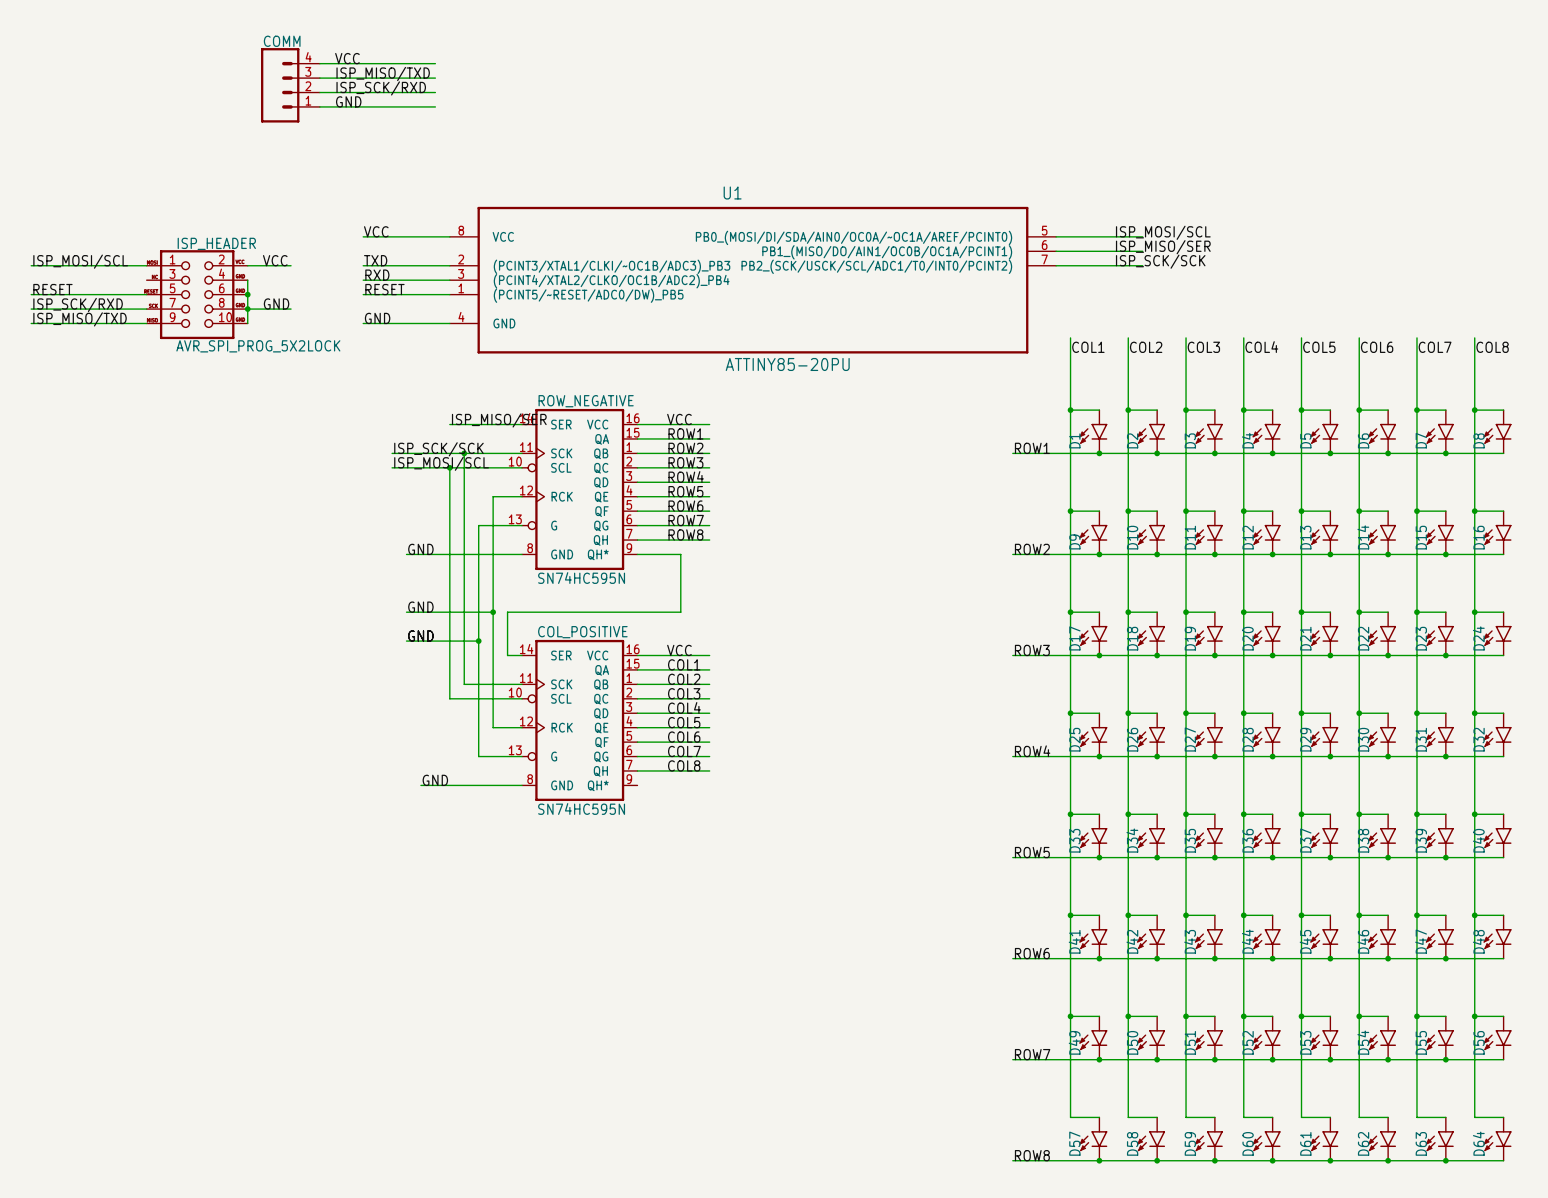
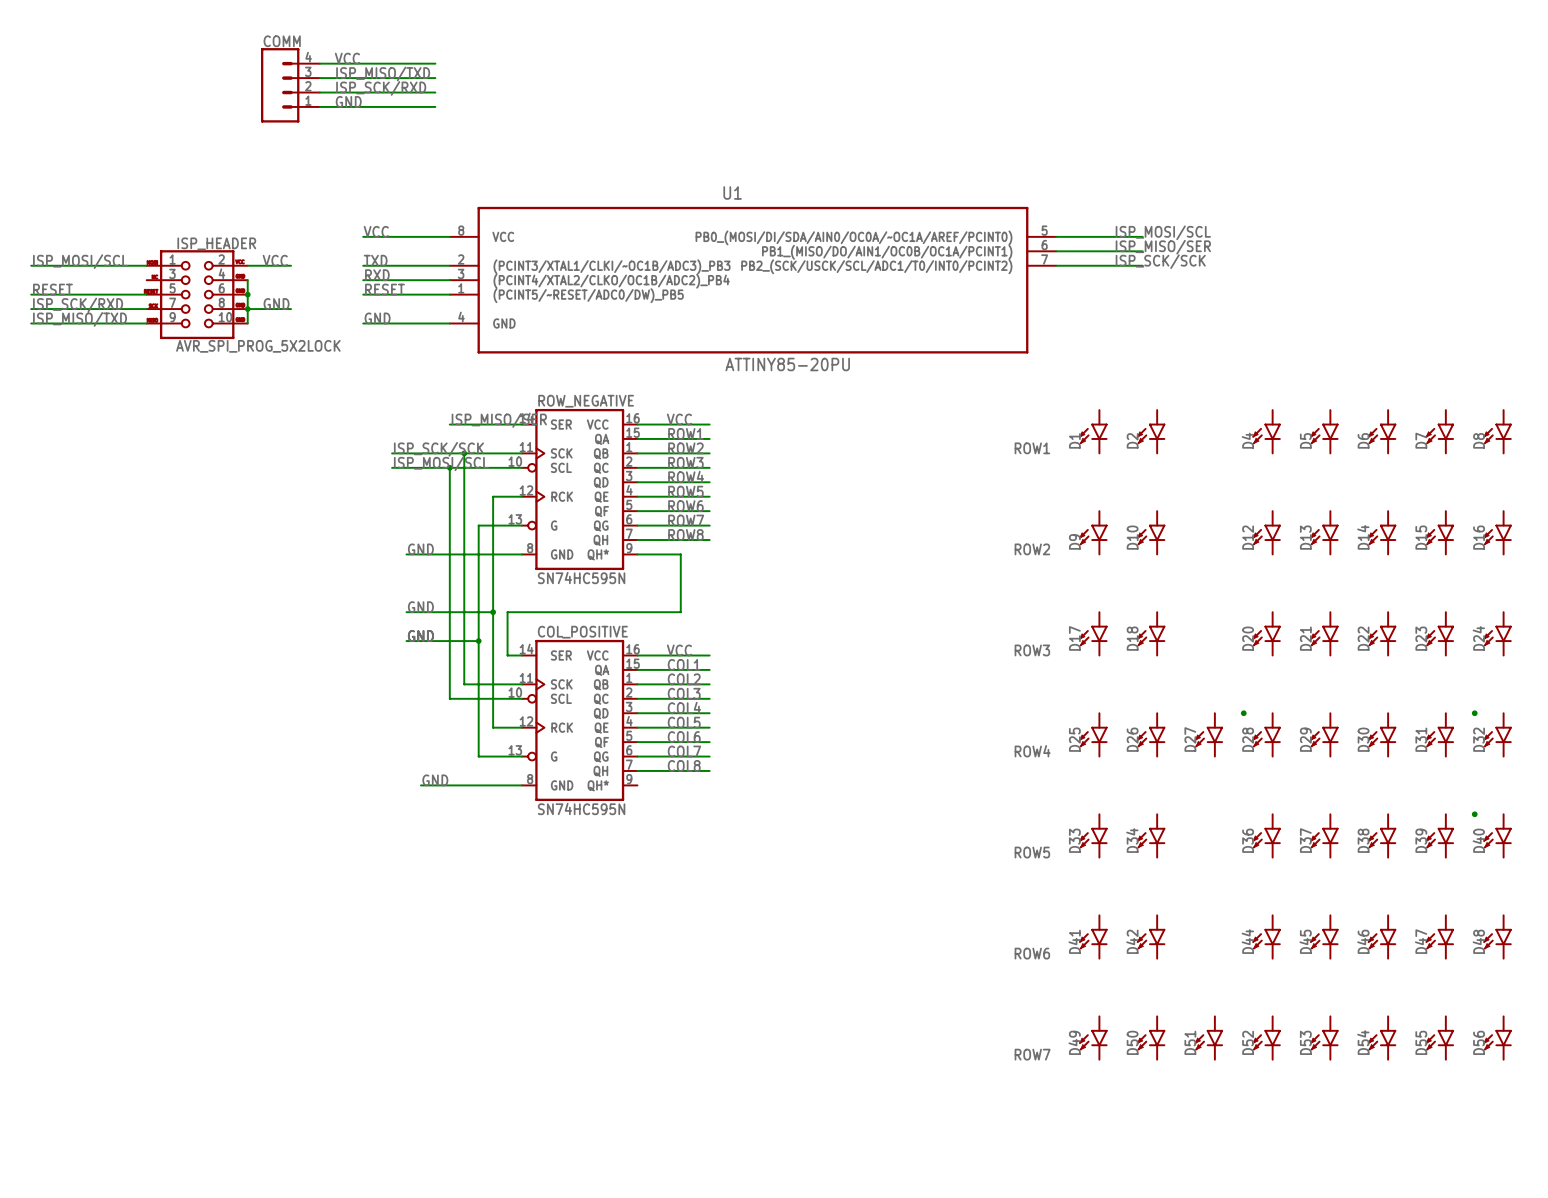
wire: (1070, 337) (1070, 1117) (1099, 1117) -> none
wire: (1128, 337) (1128, 1117) (1157, 1117) -> none
wire: (1186, 337) (1186, 1117) (1214, 1117) -> none
wire: (1243, 337) (1243, 1117) (1272, 1117) -> none
wire: (1301, 337) (1301, 1117) (1330, 1117) -> none
wire: (1359, 337) (1359, 1117) (1388, 1117) -> none
wire: (1416, 337) (1416, 1117) (1445, 1117) -> none
wire: (1474, 337) (1474, 1117) (1503, 1117) -> none
label: COL1 (1088, 347) -> none
label: COL2 (1146, 347) -> none
label: COL3 (1203, 347) -> none
label: COL4 (1261, 347) -> none
label: COL5 (1319, 347) -> none
label: COL6 (1377, 347) -> none
label: COL7 (1435, 347) -> none
label: COL8 (1492, 347) -> none
wire: (1070, 410) (1099, 410) -> none
junction: (1070, 410) -> none
wire: (1128, 410) (1157, 410) -> none
junction: (1128, 410) -> none
wire: (1186, 410) (1214, 410) -> none
junction: (1186, 410) -> none
wire: (1243, 410) (1272, 410) -> none
junction: (1243, 410) -> none
wire: (1301, 410) (1330, 410) -> none
junction: (1301, 410) -> none
wire: (1359, 410) (1388, 410) -> none
junction: (1359, 410) -> none
wire: (1416, 410) (1445, 410) -> none
junction: (1416, 410) -> none
wire: (1474, 410) (1503, 410) -> none
junction: (1474, 410) -> none
D3: (1208, 431) -> none
wire: (1012, 453) (1503, 453) -> none
junction: (1099, 453) -> none
junction: (1157, 453) -> none
junction: (1214, 453) -> none
junction: (1272, 453) -> none
junction: (1330, 453) -> none
junction: (1388, 453) -> none
junction: (1445, 453) -> none
wire: (1070, 511) (1099, 511) -> none
junction: (1070, 511) -> none
wire: (1128, 511) (1157, 511) -> none
junction: (1128, 511) -> none
wire: (1186, 511) (1214, 511) -> none
junction: (1186, 511) -> none
wire: (1243, 511) (1272, 511) -> none
junction: (1243, 511) -> none
wire: (1301, 511) (1330, 511) -> none
junction: (1301, 511) -> none
wire: (1359, 511) (1388, 511) -> none
junction: (1359, 511) -> none
wire: (1416, 511) (1445, 511) -> none
junction: (1416, 511) -> none
wire: (1474, 511) (1503, 511) -> none
junction: (1474, 511) -> none
D11: (1208, 532) -> none
wire: (1012, 554) (1503, 554) -> none
junction: (1099, 554) -> none
junction: (1157, 554) -> none
junction: (1214, 554) -> none
junction: (1272, 554) -> none
junction: (1330, 554) -> none
junction: (1388, 554) -> none
junction: (1445, 554) -> none
wire: (1070, 612) (1099, 612) -> none
junction: (1070, 612) -> none
wire: (1128, 612) (1157, 612) -> none
junction: (1128, 612) -> none
wire: (1186, 612) (1214, 612) -> none
junction: (1186, 612) -> none
wire: (1243, 612) (1272, 612) -> none
junction: (1243, 612) -> none
wire: (1301, 612) (1330, 612) -> none
junction: (1301, 612) -> none
wire: (1359, 612) (1388, 612) -> none
junction: (1359, 612) -> none
wire: (1416, 612) (1445, 612) -> none
junction: (1416, 612) -> none
wire: (1474, 612) (1503, 612) -> none
junction: (1474, 612) -> none
D19: (1208, 633) -> none
wire: (1012, 655) (1503, 655) -> none
junction: (1099, 655) -> none
junction: (1157, 655) -> none
junction: (1214, 655) -> none
junction: (1272, 655) -> none
junction: (1330, 655) -> none
junction: (1388, 655) -> none
junction: (1445, 655) -> none
wire: (1070, 713) (1099, 713) -> none
junction: (1070, 713) -> none
wire: (1128, 713) (1157, 713) -> none
junction: (1128, 713) -> none
wire: (1186, 713) (1214, 713) -> none
junction: (1186, 713) -> none
wire: (1243, 713) (1272, 713) -> none
wire: (1301, 713) (1330, 713) -> none
junction: (1301, 713) -> none
wire: (1359, 713) (1388, 713) -> none
junction: (1359, 713) -> none
wire: (1416, 713) (1445, 713) -> none
junction: (1416, 713) -> none
wire: (1474, 713) (1503, 713) -> none
wire: (1012, 756) (1503, 756) -> none
junction: (1099, 756) -> none
junction: (1157, 756) -> none
junction: (1214, 756) -> none
junction: (1272, 756) -> none
junction: (1330, 756) -> none
junction: (1388, 756) -> none
junction: (1445, 756) -> none
wire: (1070, 814) (1099, 814) -> none
junction: (1070, 814) -> none
wire: (1128, 814) (1157, 814) -> none
junction: (1128, 814) -> none
wire: (1186, 814) (1214, 814) -> none
junction: (1186, 814) -> none
wire: (1243, 814) (1272, 814) -> none
junction: (1243, 814) -> none
wire: (1301, 814) (1330, 814) -> none
junction: (1301, 814) -> none
wire: (1359, 814) (1388, 814) -> none
junction: (1359, 814) -> none
wire: (1416, 814) (1445, 814) -> none
junction: (1416, 814) -> none
wire: (1474, 814) (1503, 814) -> none
D35: (1208, 835) -> none
wire: (1012, 857) (1503, 857) -> none
junction: (1099, 857) -> none
junction: (1157, 857) -> none
junction: (1214, 857) -> none
junction: (1272, 857) -> none
junction: (1330, 857) -> none
junction: (1388, 857) -> none
junction: (1445, 857) -> none
wire: (1070, 915) (1099, 915) -> none
junction: (1070, 915) -> none
wire: (1128, 915) (1157, 915) -> none
junction: (1128, 915) -> none
wire: (1186, 915) (1214, 915) -> none
junction: (1186, 915) -> none
wire: (1243, 915) (1272, 915) -> none
junction: (1243, 915) -> none
wire: (1301, 915) (1330, 915) -> none
junction: (1301, 915) -> none
wire: (1359, 915) (1388, 915) -> none
junction: (1359, 915) -> none
wire: (1416, 915) (1445, 915) -> none
junction: (1416, 915) -> none
wire: (1474, 915) (1503, 915) -> none
junction: (1474, 915) -> none
D43: (1208, 936) -> none
wire: (1012, 958) (1503, 958) -> none
junction: (1099, 958) -> none
junction: (1157, 958) -> none
junction: (1214, 958) -> none
junction: (1272, 958) -> none
junction: (1330, 958) -> none
junction: (1388, 958) -> none
junction: (1445, 958) -> none
wire: (1070, 1016) (1099, 1016) -> none
junction: (1070, 1016) -> none
wire: (1128, 1016) (1157, 1016) -> none
junction: (1128, 1016) -> none
wire: (1186, 1016) (1214, 1016) -> none
junction: (1186, 1016) -> none
wire: (1243, 1016) (1272, 1016) -> none
junction: (1243, 1016) -> none
wire: (1301, 1016) (1330, 1016) -> none
junction: (1301, 1016) -> none
wire: (1359, 1016) (1388, 1016) -> none
junction: (1359, 1016) -> none
wire: (1416, 1016) (1445, 1016) -> none
junction: (1416, 1016) -> none
wire: (1474, 1016) (1503, 1016) -> none
junction: (1474, 1016) -> none
wire: (1012, 1059) (1503, 1059) -> none
junction: (1099, 1059) -> none
junction: (1157, 1059) -> none
junction: (1214, 1059) -> none
junction: (1272, 1059) -> none
junction: (1330, 1059) -> none
junction: (1388, 1059) -> none
junction: (1445, 1059) -> none
D57: (1093, 1139) -> none
D58: (1151, 1139) -> none
D59: (1208, 1139) -> none
D60: (1266, 1139) -> none
D61: (1324, 1139) -> none
D62: (1382, 1139) -> none
D63: (1439, 1139) -> none
D64: (1497, 1139) -> none
label: ROW8 (1032, 1155) -> none
wire: (1012, 1160) (1503, 1160) -> none
junction: (1099, 1160) -> none
junction: (1157, 1160) -> none
junction: (1214, 1160) -> none
junction: (1272, 1160) -> none
junction: (1330, 1160) -> none
junction: (1388, 1160) -> none
junction: (1445, 1160) -> none

